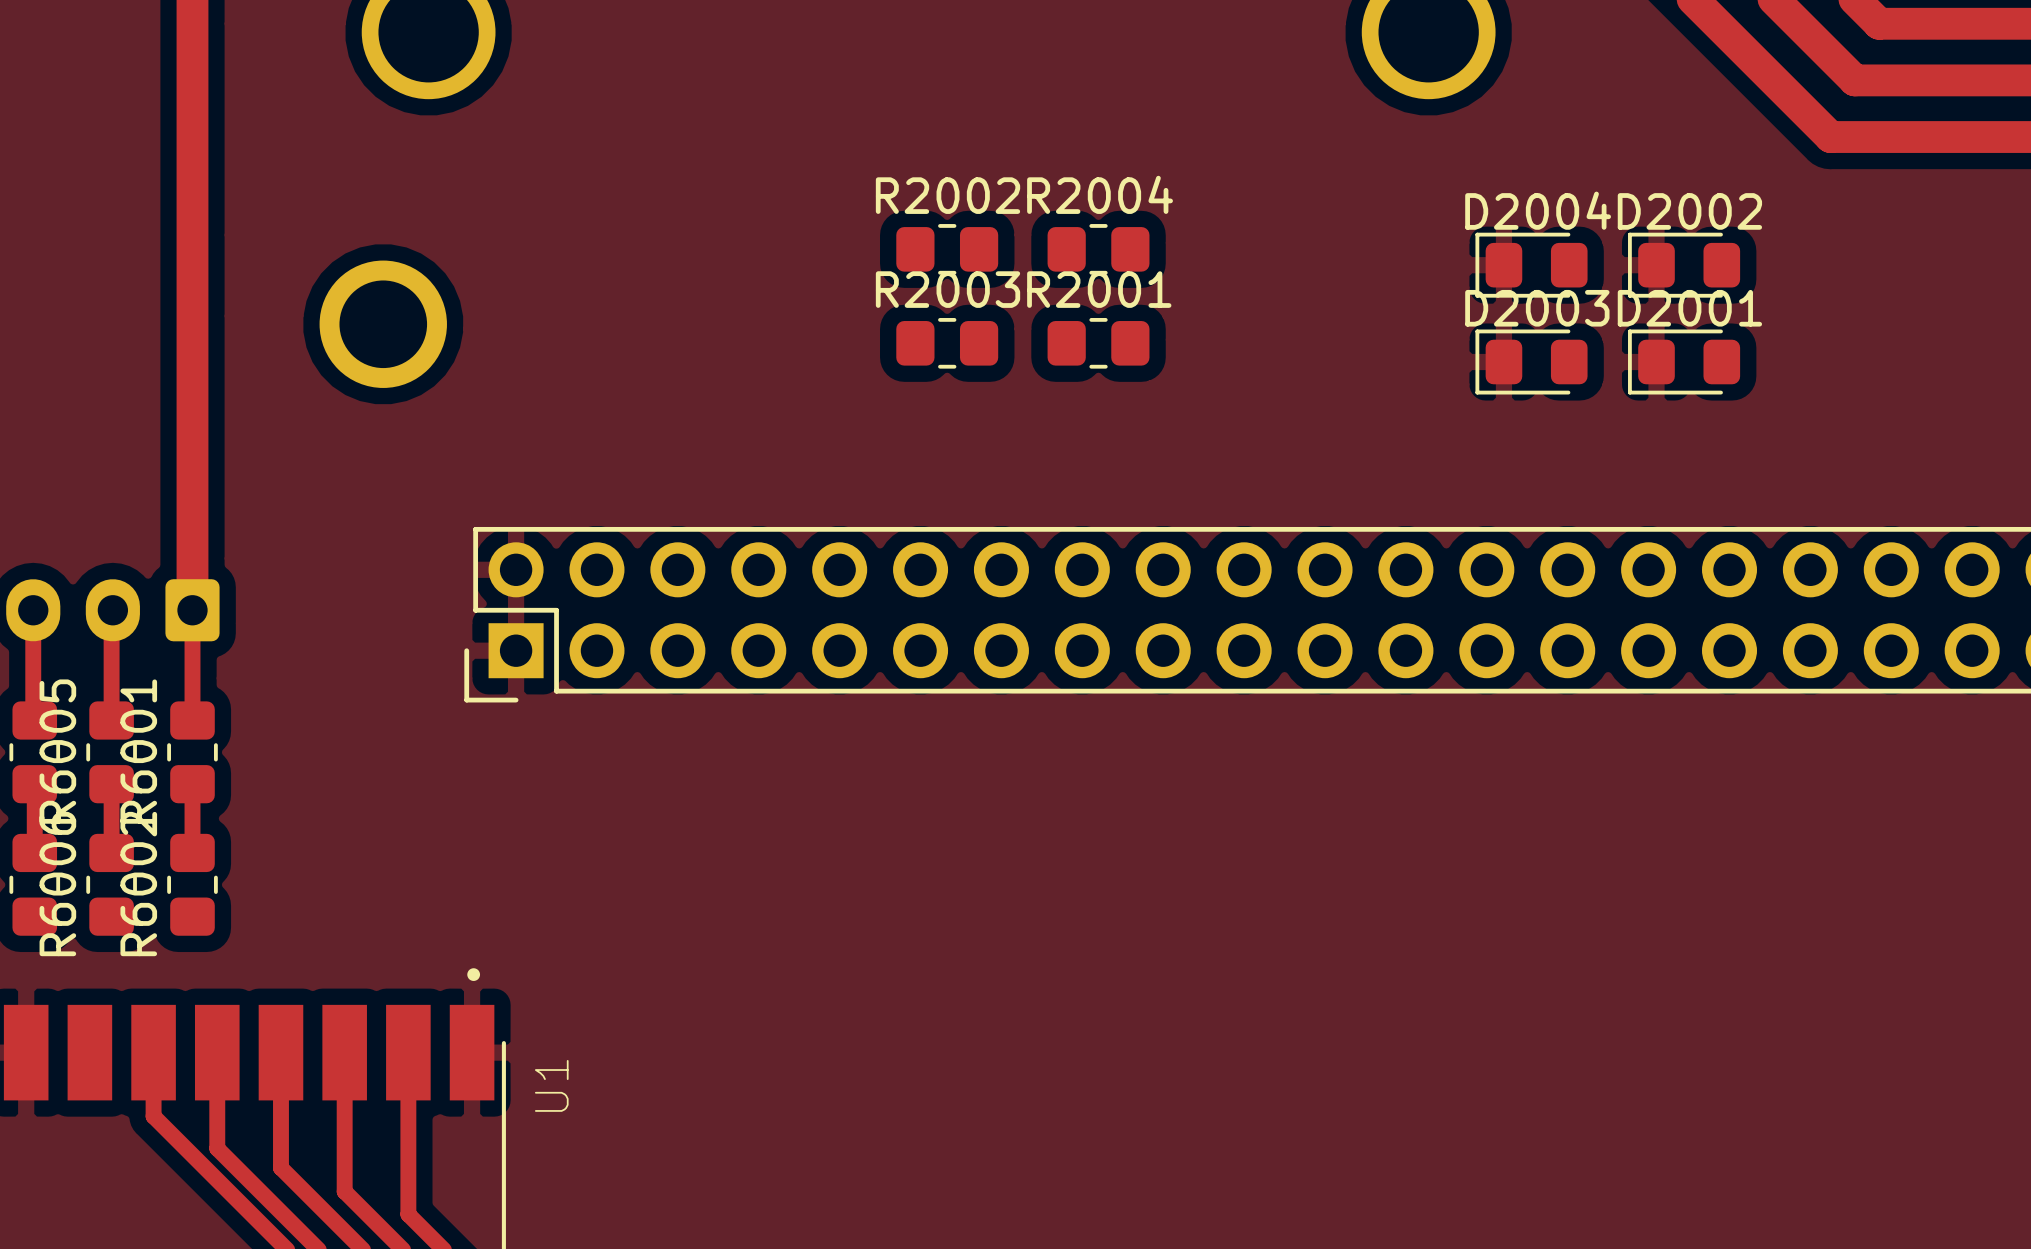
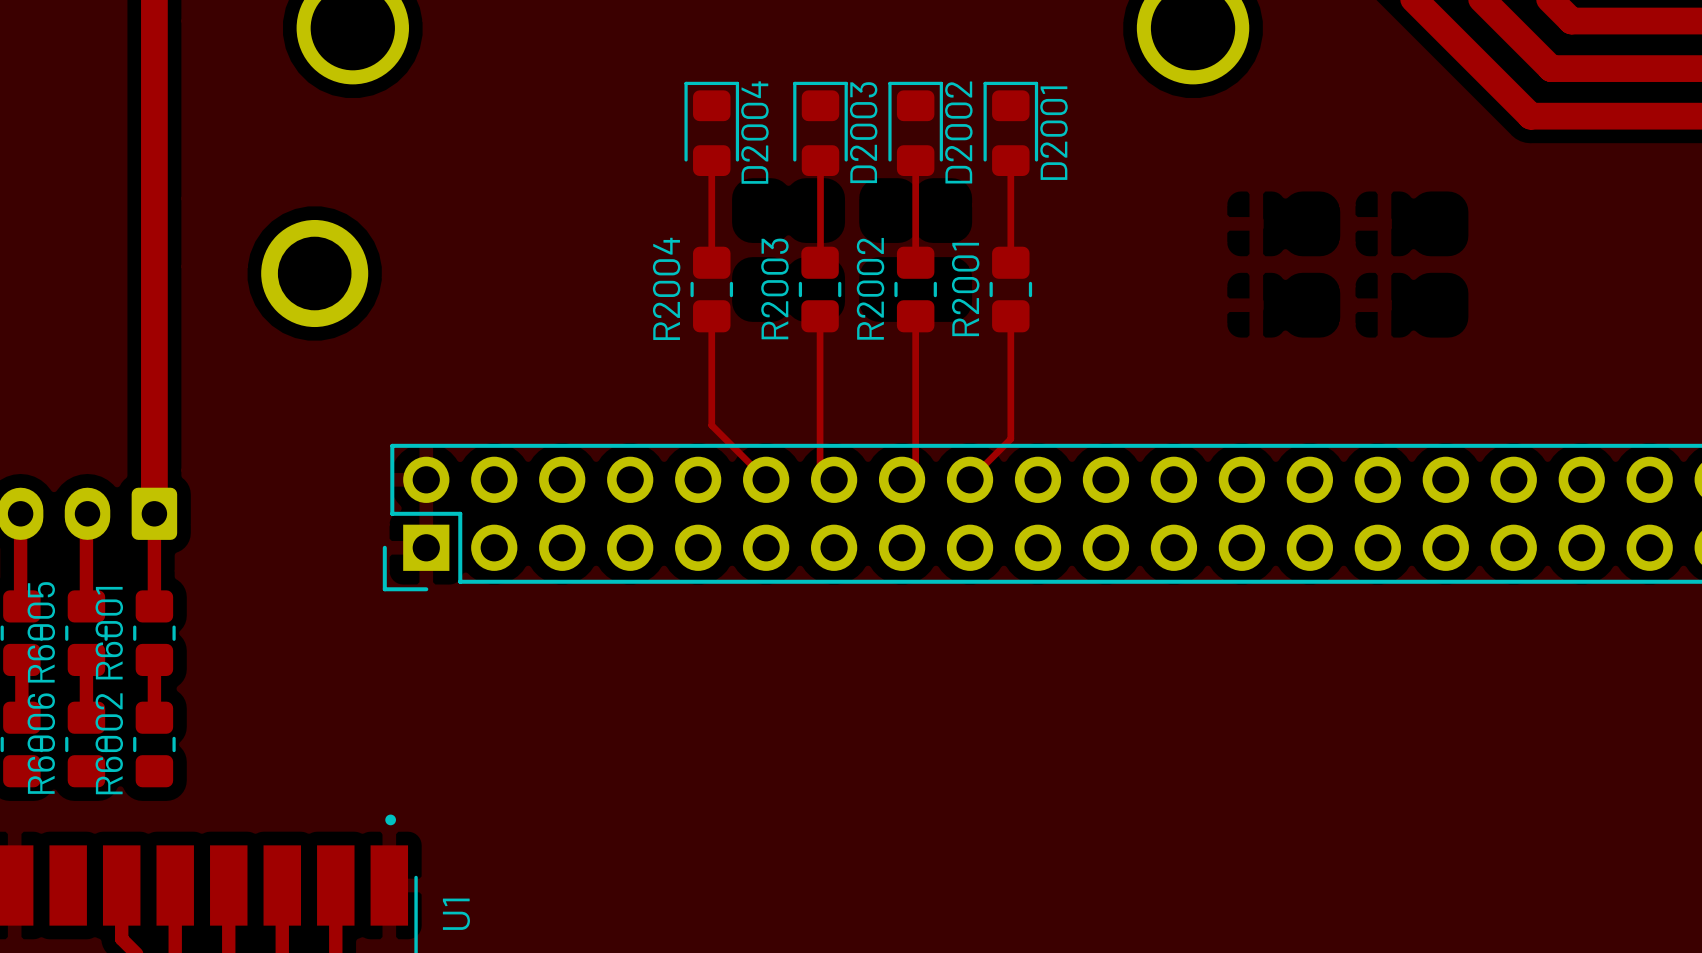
track: none -> (711, 160) (711, 262)
track: none -> (820, 160) (820, 262)
track: none -> (915, 160) (915, 262)
track: none -> (1010, 160) (1010, 262)
R2004 name position: R2004 (1100, 194) -> R2004 (666, 288)
R2002 name position: R2002 (948, 195) -> R2002 (870, 288)
R2002 rotation: 0° (947, 249) -> 90° clockwise (915, 289)
R2002 position: (947, 249) -> (915, 289)
R2004 rotation: 0° (1098, 249) -> 90° clockwise (711, 289)
R2004 position: (1098, 249) -> (711, 289)
D2004 rotation: 0° (1531, 265) -> 90° clockwise (711, 128)
D2004 position: (1531, 265) -> (711, 128)
D2002 rotation: 0° (1684, 265) -> 90° clockwise (915, 128)
D2002 position: (1684, 265) -> (915, 128)
R2003 name position: R2003 (948, 289) -> R2003 (774, 288)
R2001 name position: R2001 (1099, 289) -> R2001 (965, 289)
R2003 rotation: 0° (947, 343) -> 90° clockwise (820, 289)
R2001 rotation: 0° (1098, 343) -> 90° clockwise (1010, 289)
R2001 position: (1098, 343) -> (1010, 289)
D2003 rotation: 0° (1531, 362) -> 90° clockwise (820, 128)
D2003 position: (1531, 362) -> (820, 128)
D2001 rotation: 0° (1684, 362) -> 90° clockwise (1010, 128)
D2001 position: (1684, 362) -> (1010, 128)
track: none -> (711, 316) (711, 425) (766, 479)
track: none -> (820, 316) (820, 465) (834, 479)
track: none -> (915, 316) (915, 466) (902, 479)
track: none -> (1010, 316) (1010, 439) (970, 479)

